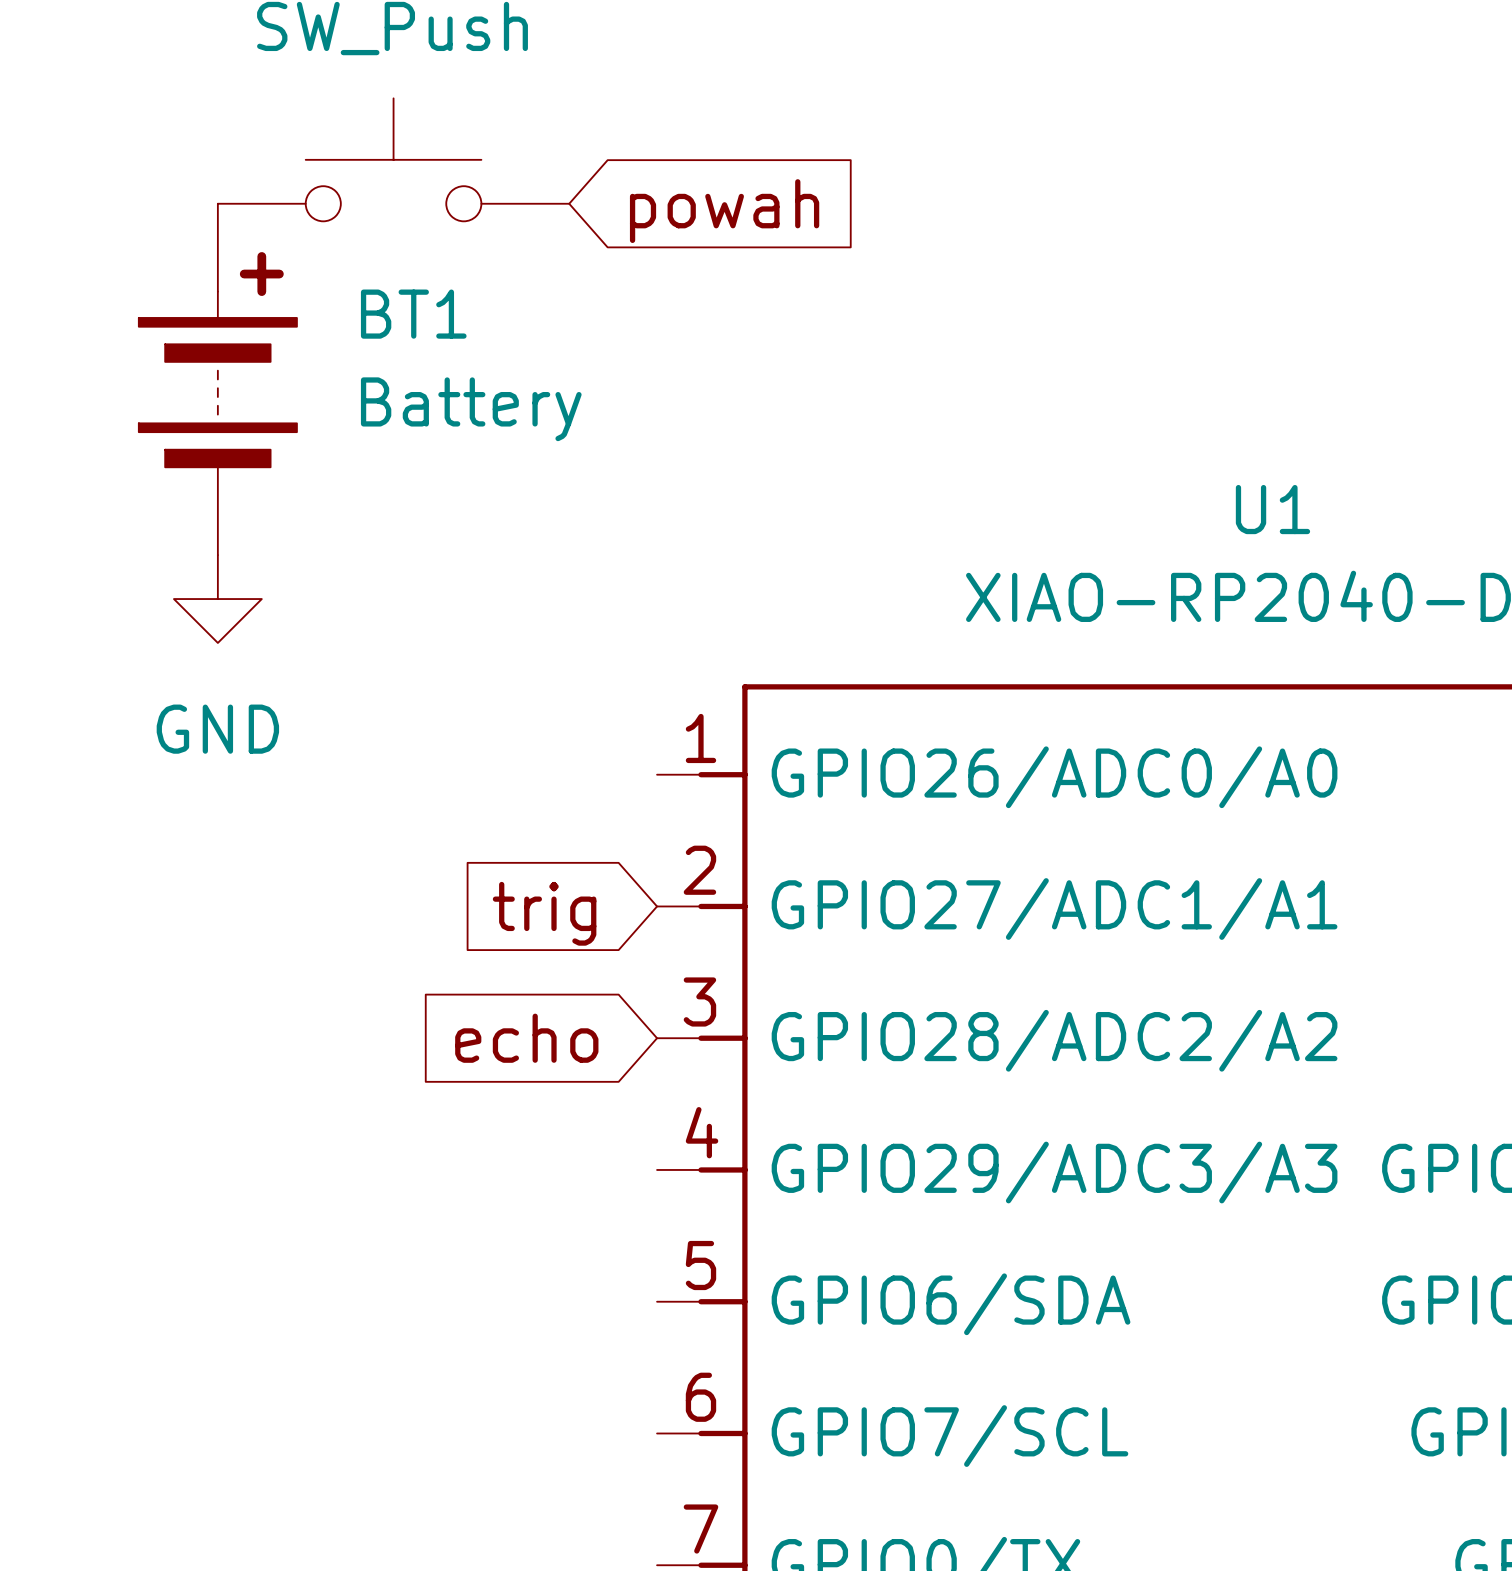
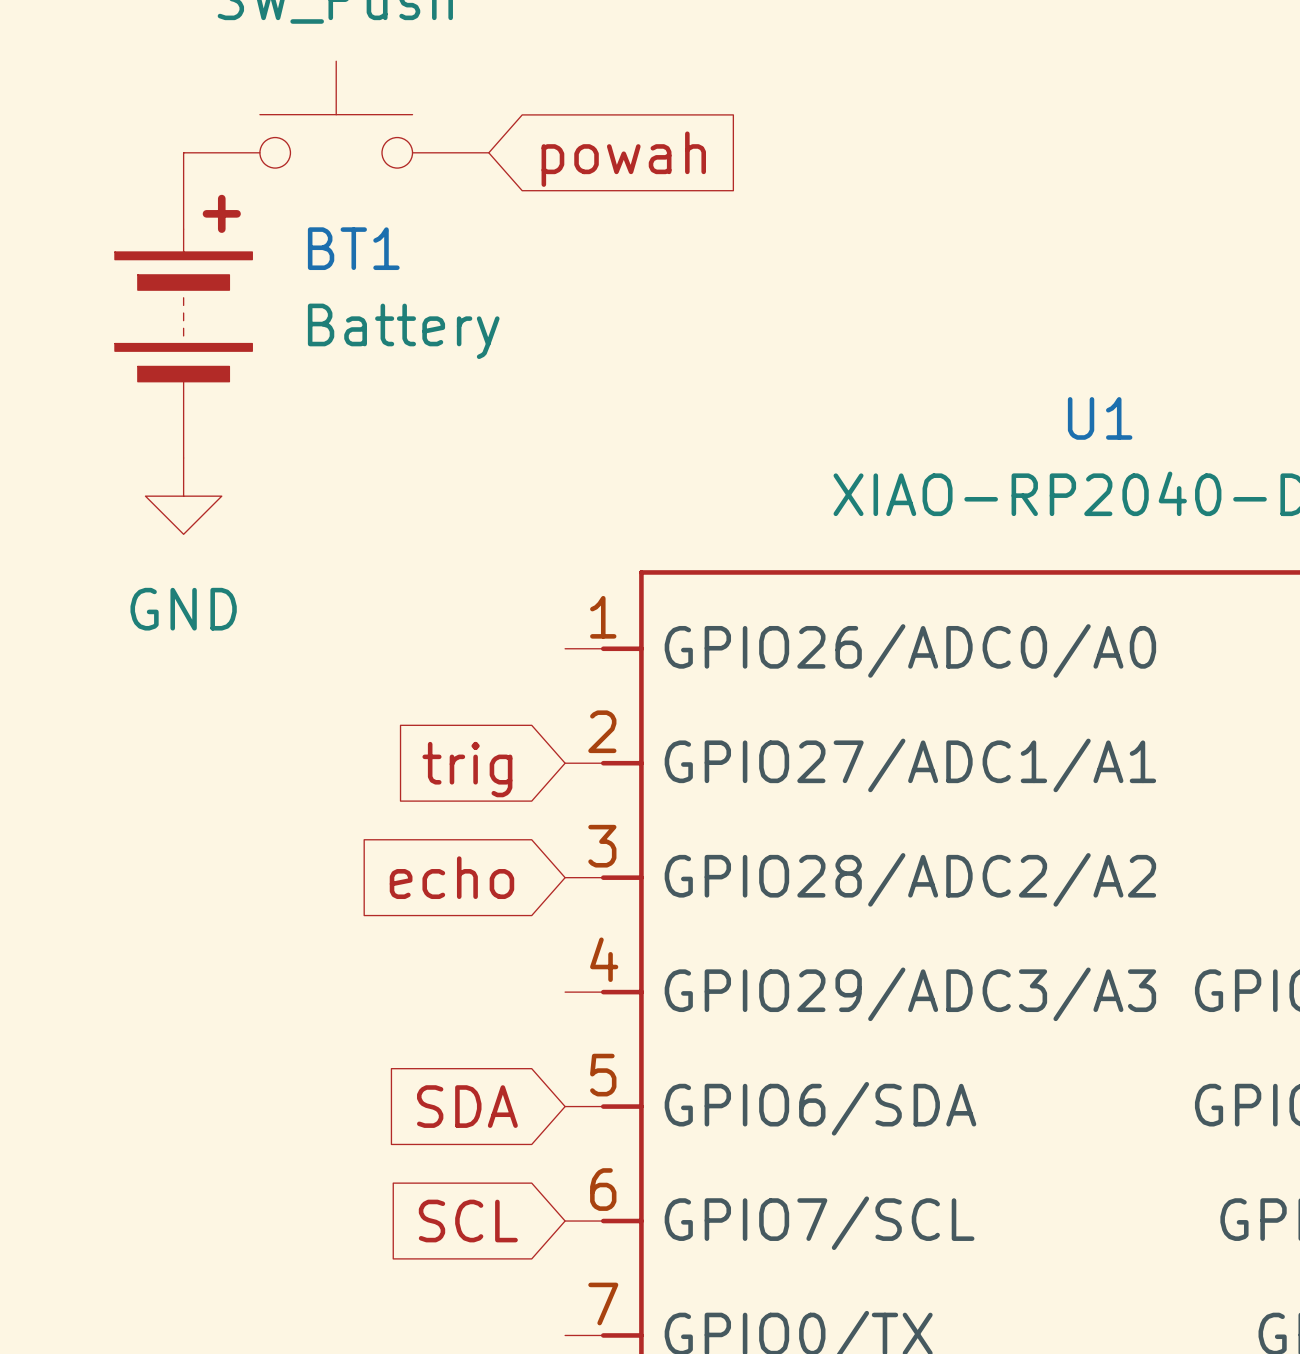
global label: none -> SDA (467, 1106)
global label: none -> SCL (468, 1221)

